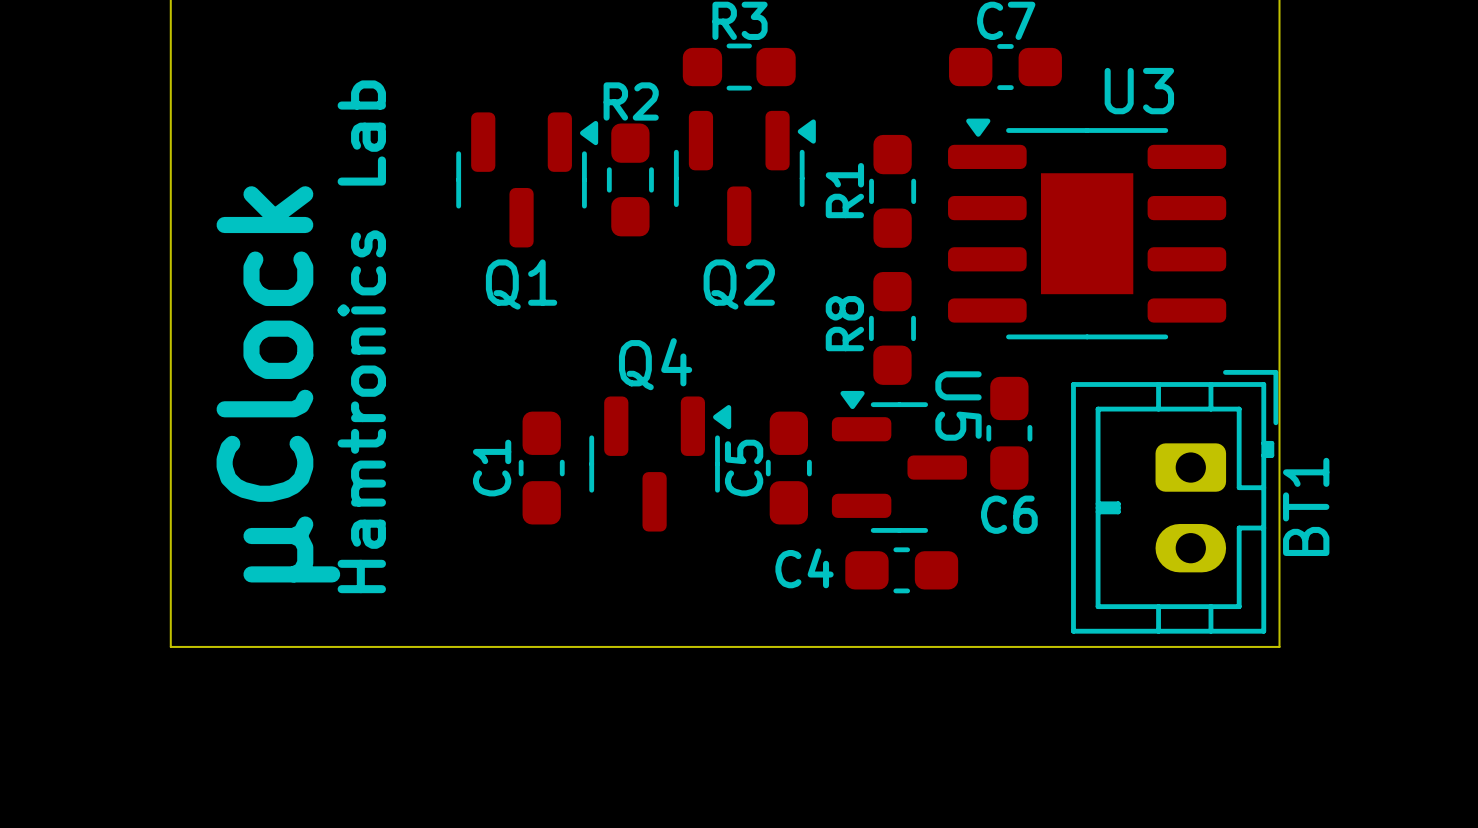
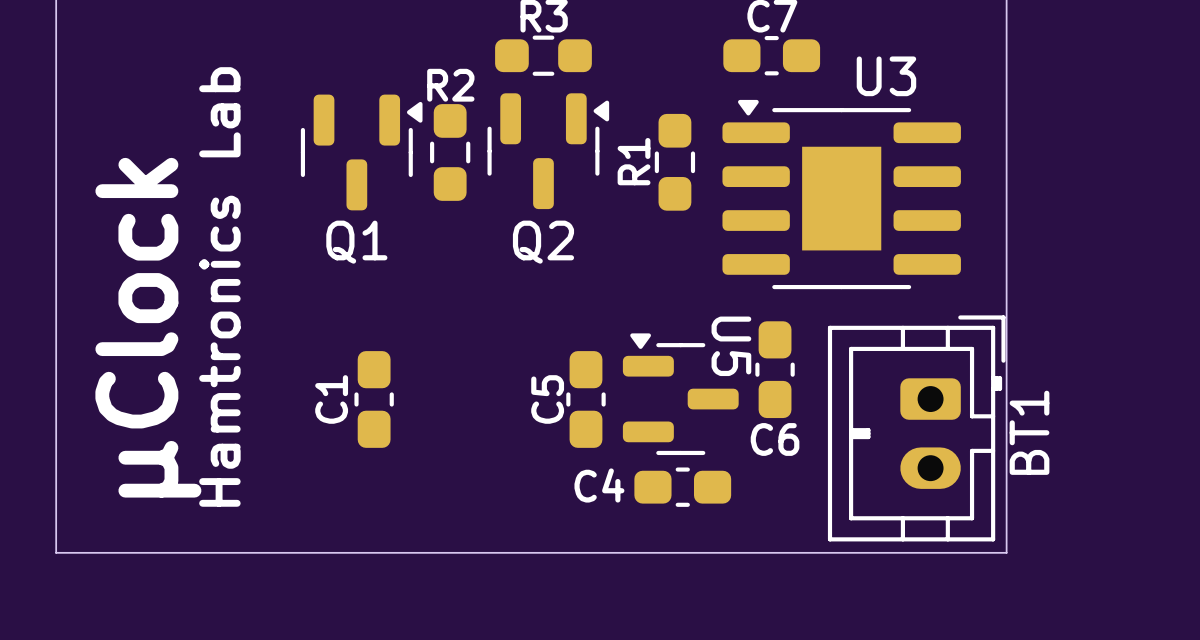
R8: (892, 328) -> none
Q4: (660, 464) -> none

